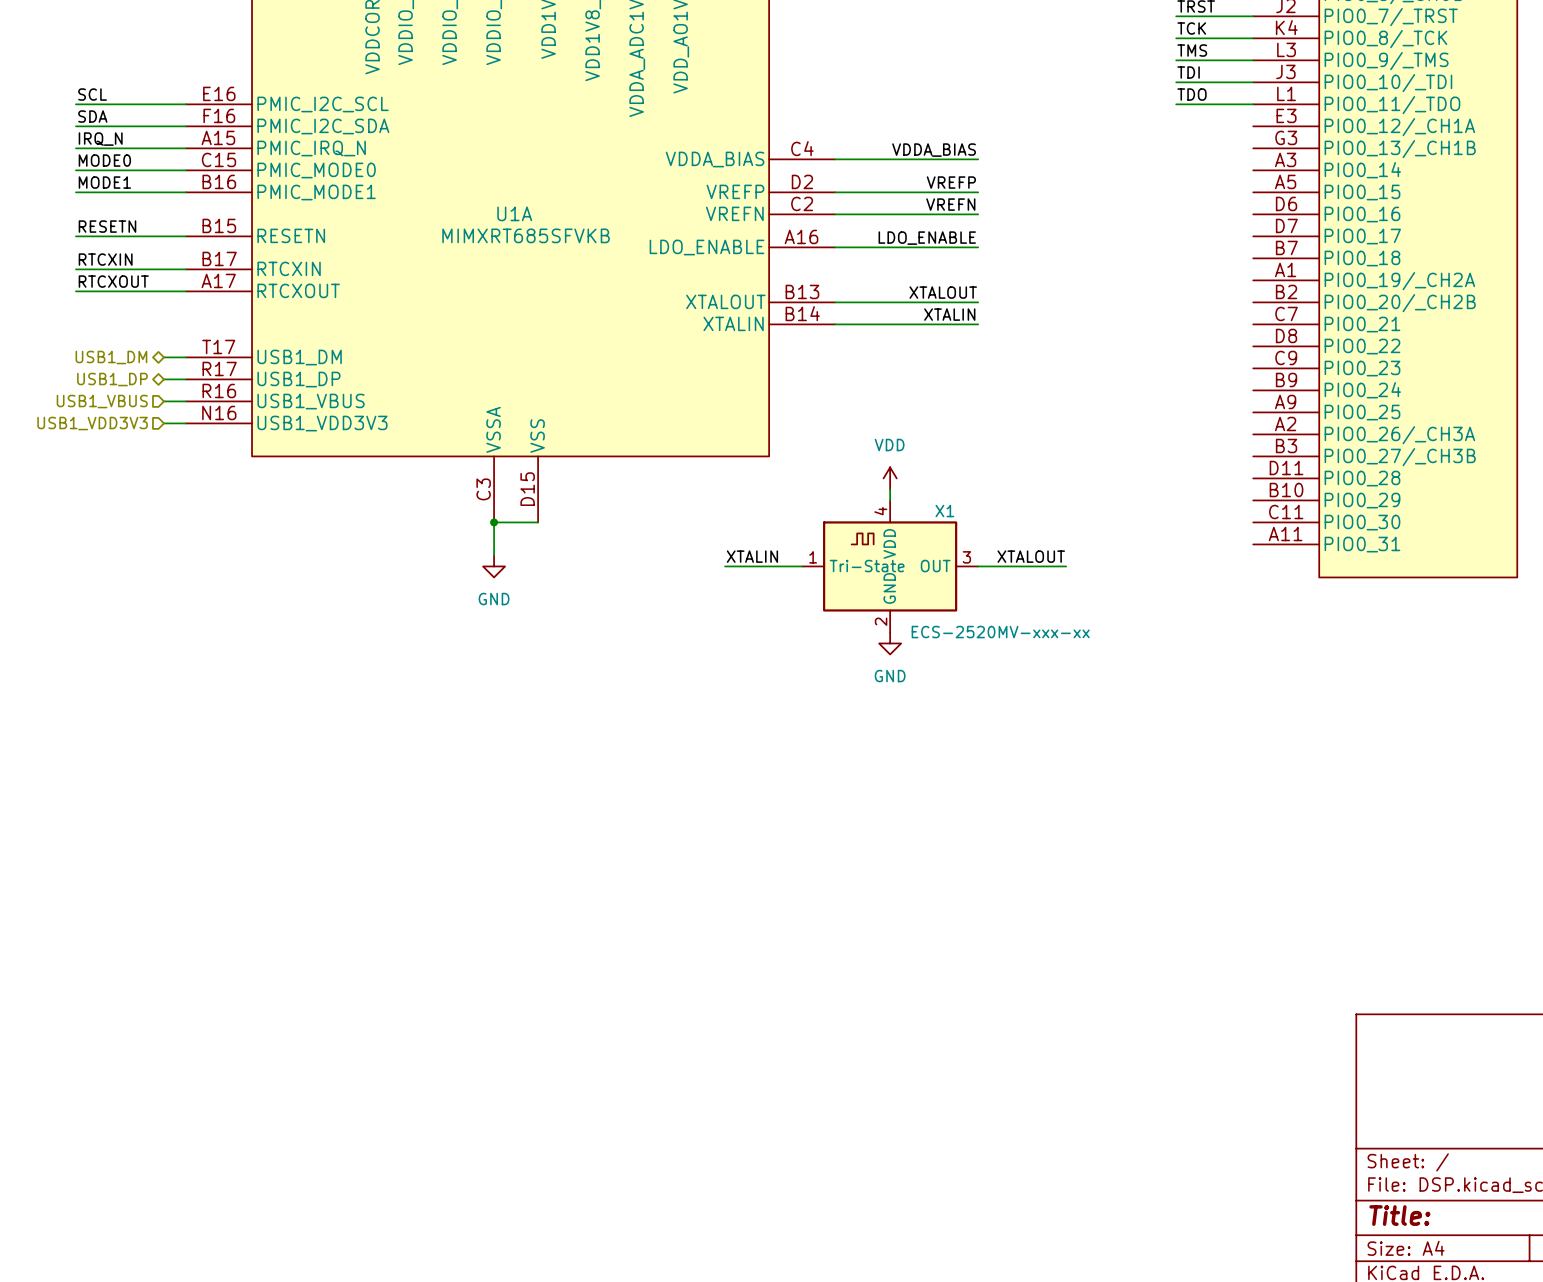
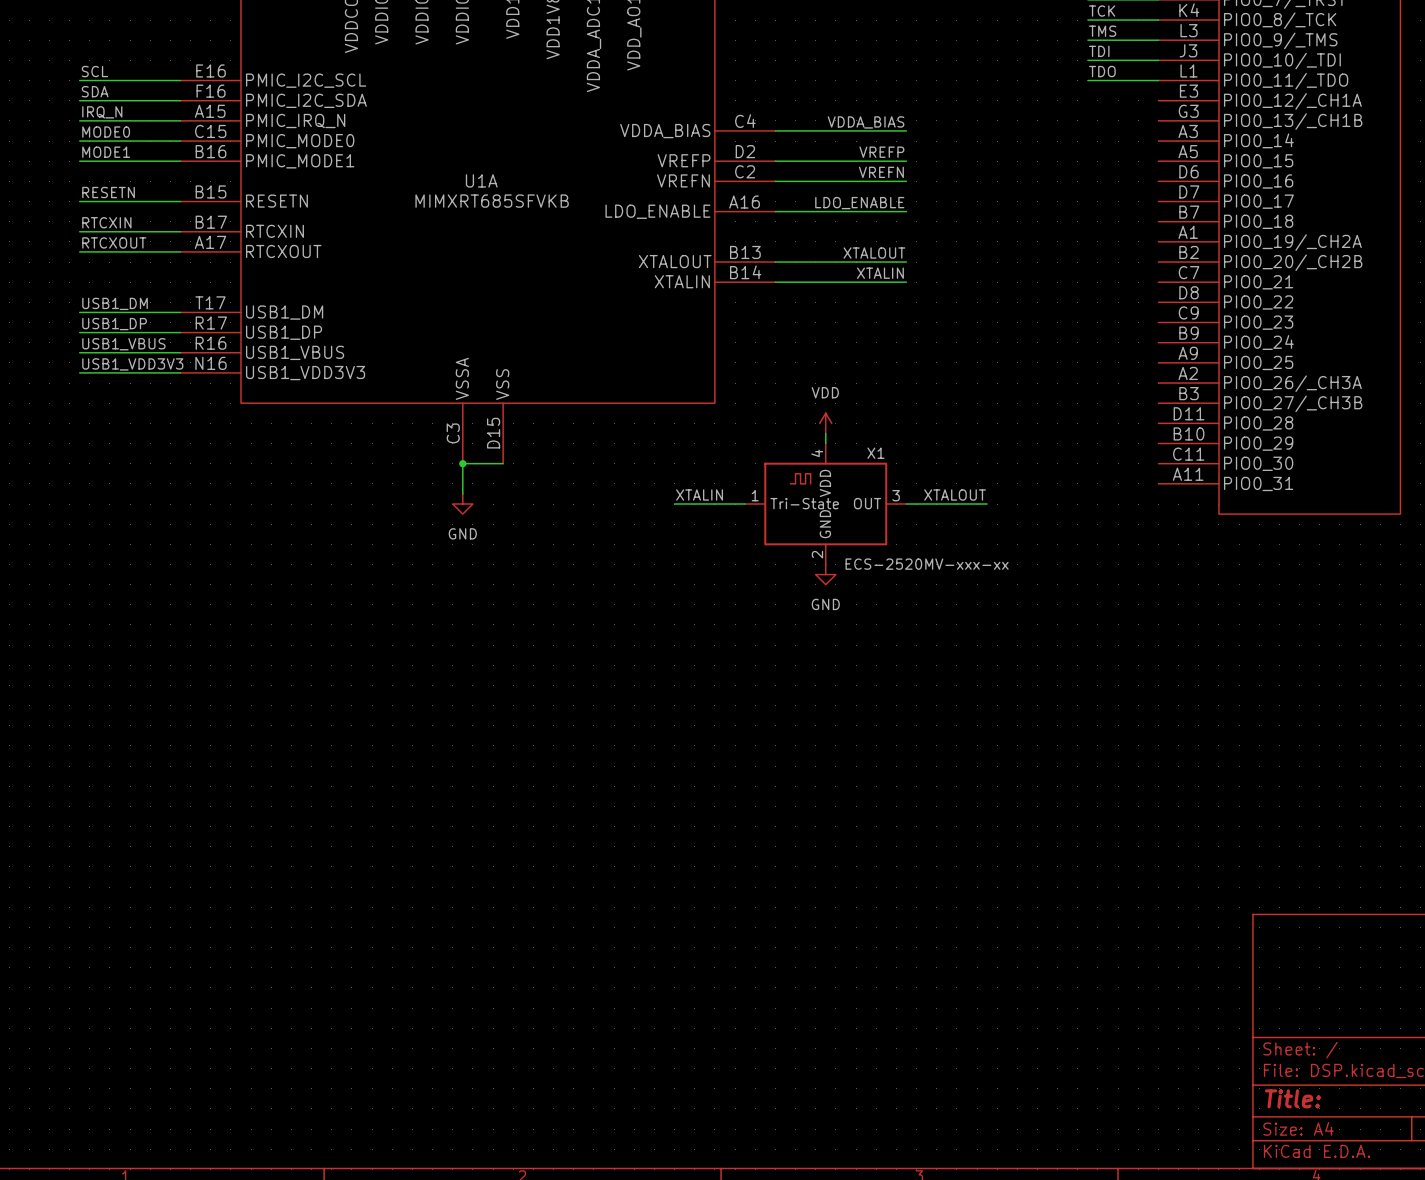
label: none -> USB1_DM (115, 303)
wire: none -> (79, 312) (160, 312)
hierarchical label: USB1_DM (111, 357) -> none
label: none -> USB1_DP (114, 324)
wire: none -> (79, 332) (160, 332)
hierarchical label: USB1_DP (112, 379) -> none
label: none -> USB1_VBUS (123, 344)
wire: none -> (79, 352) (160, 352)
hierarchical label: USB1_VBUS (102, 401) -> none
label: none -> USB1_VDD3V3 (132, 364)
wire: none -> (79, 372) (160, 372)
hierarchical label: USB1_VDD3V3 (92, 423) -> none

